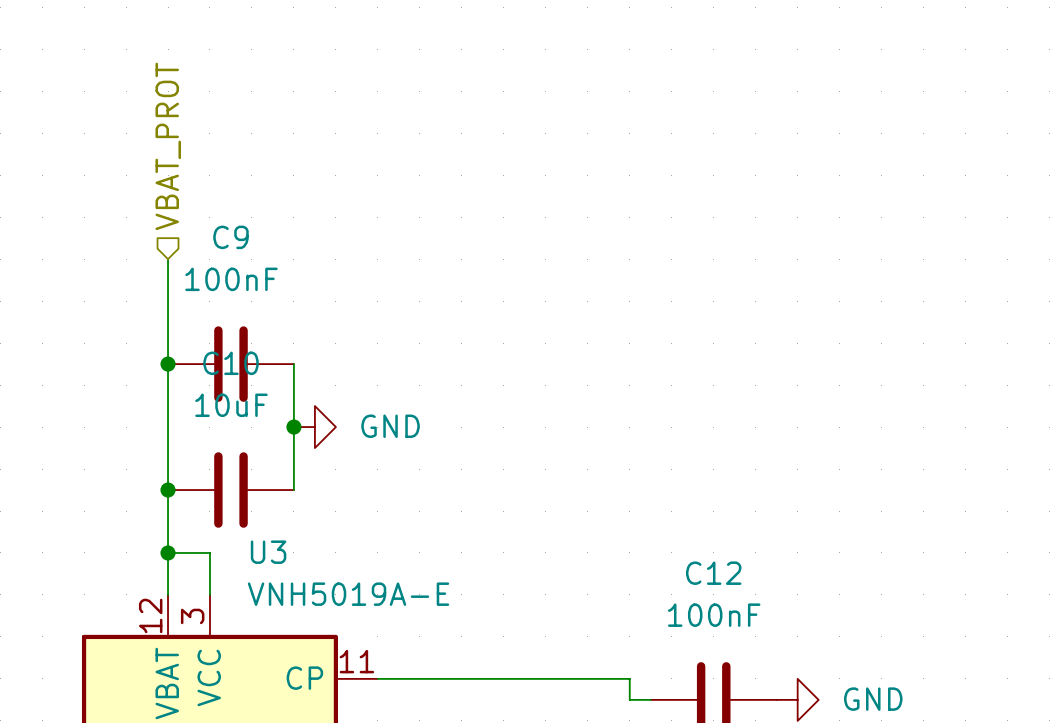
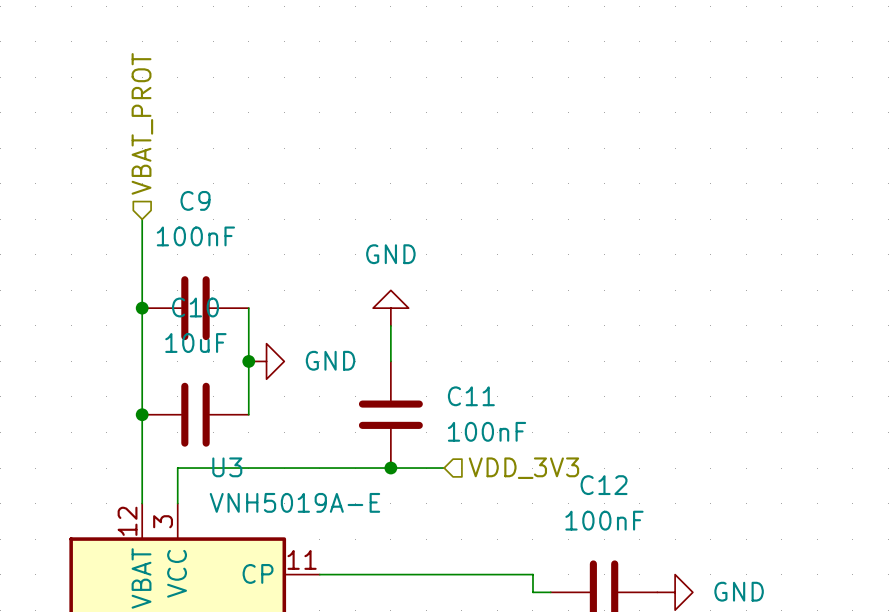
power symbol: none -> GND (390, 308)
wire: none -> (390, 325) (390, 361)
C11: none -> 100nF (390, 414)
wire: (168, 552) (209, 552) -> (444, 468) (177, 468)
junction: (168, 552) -> none
junction: none -> (390, 468)
hierarchical label: none -> VDD_3V3 (523, 468)

